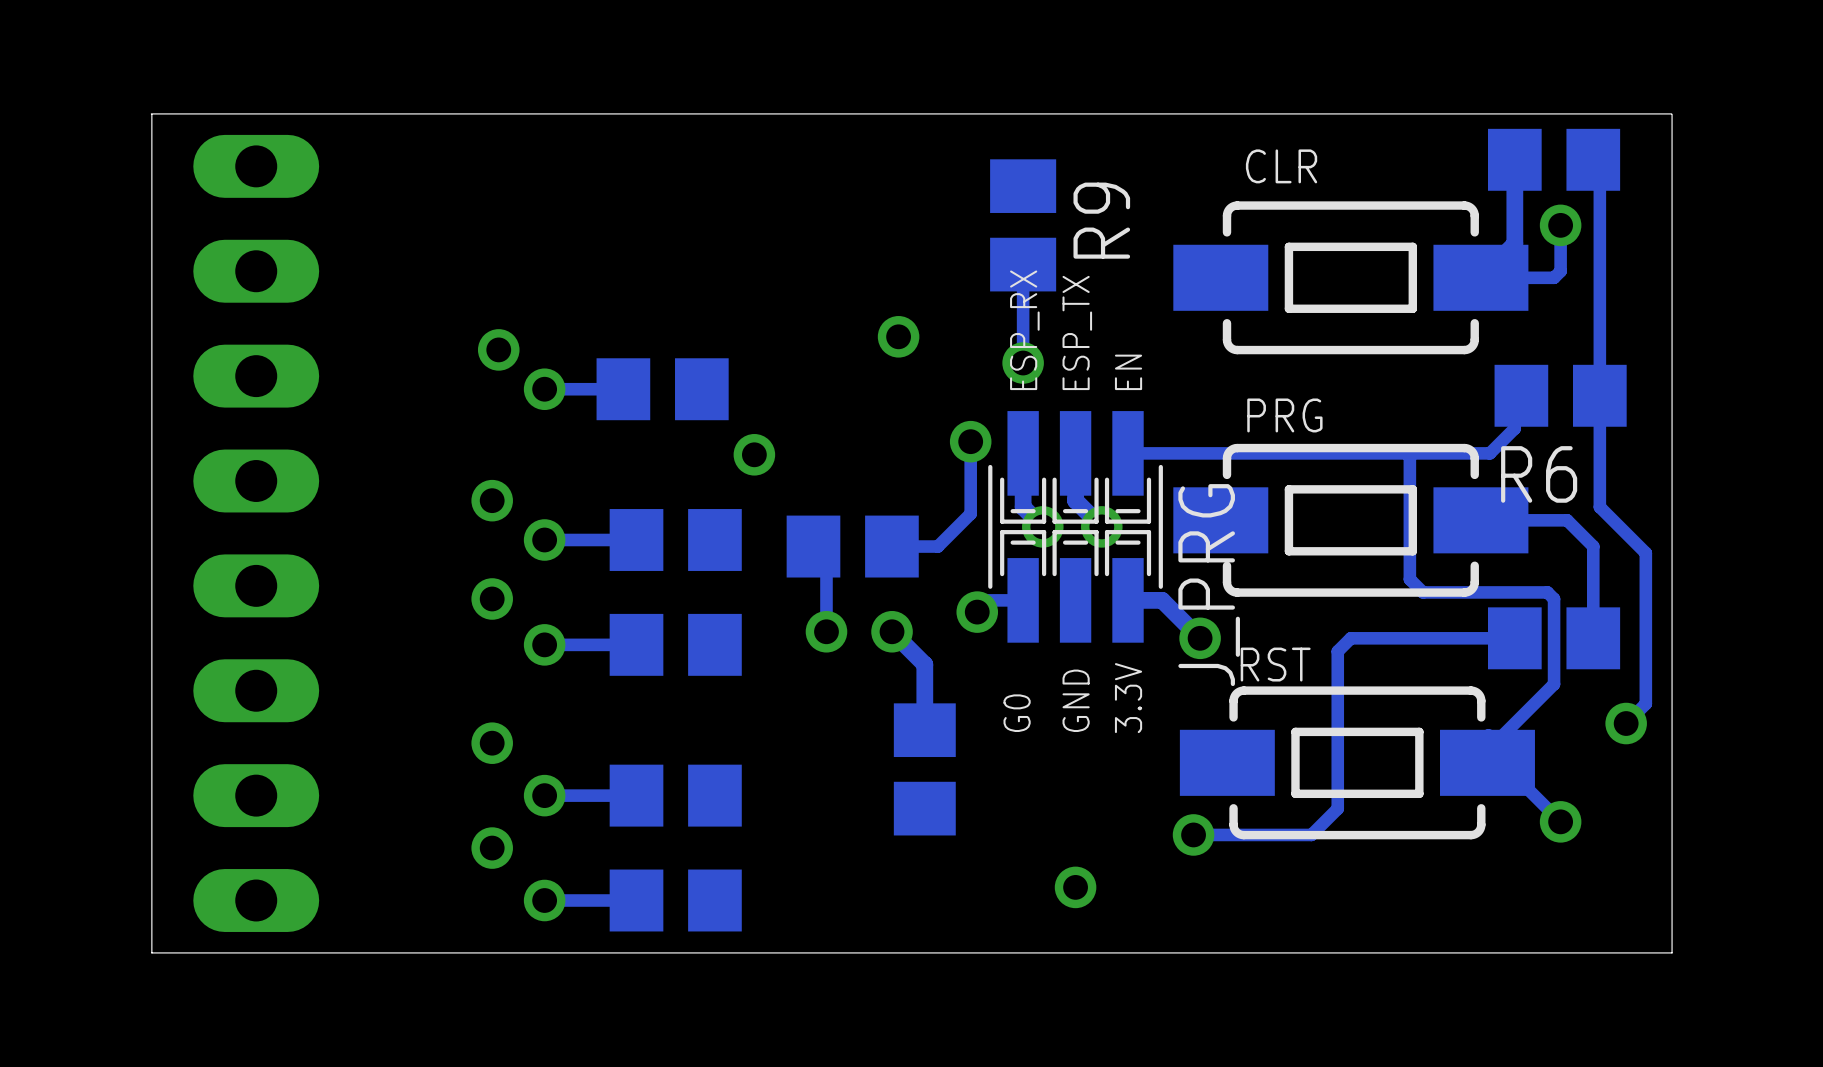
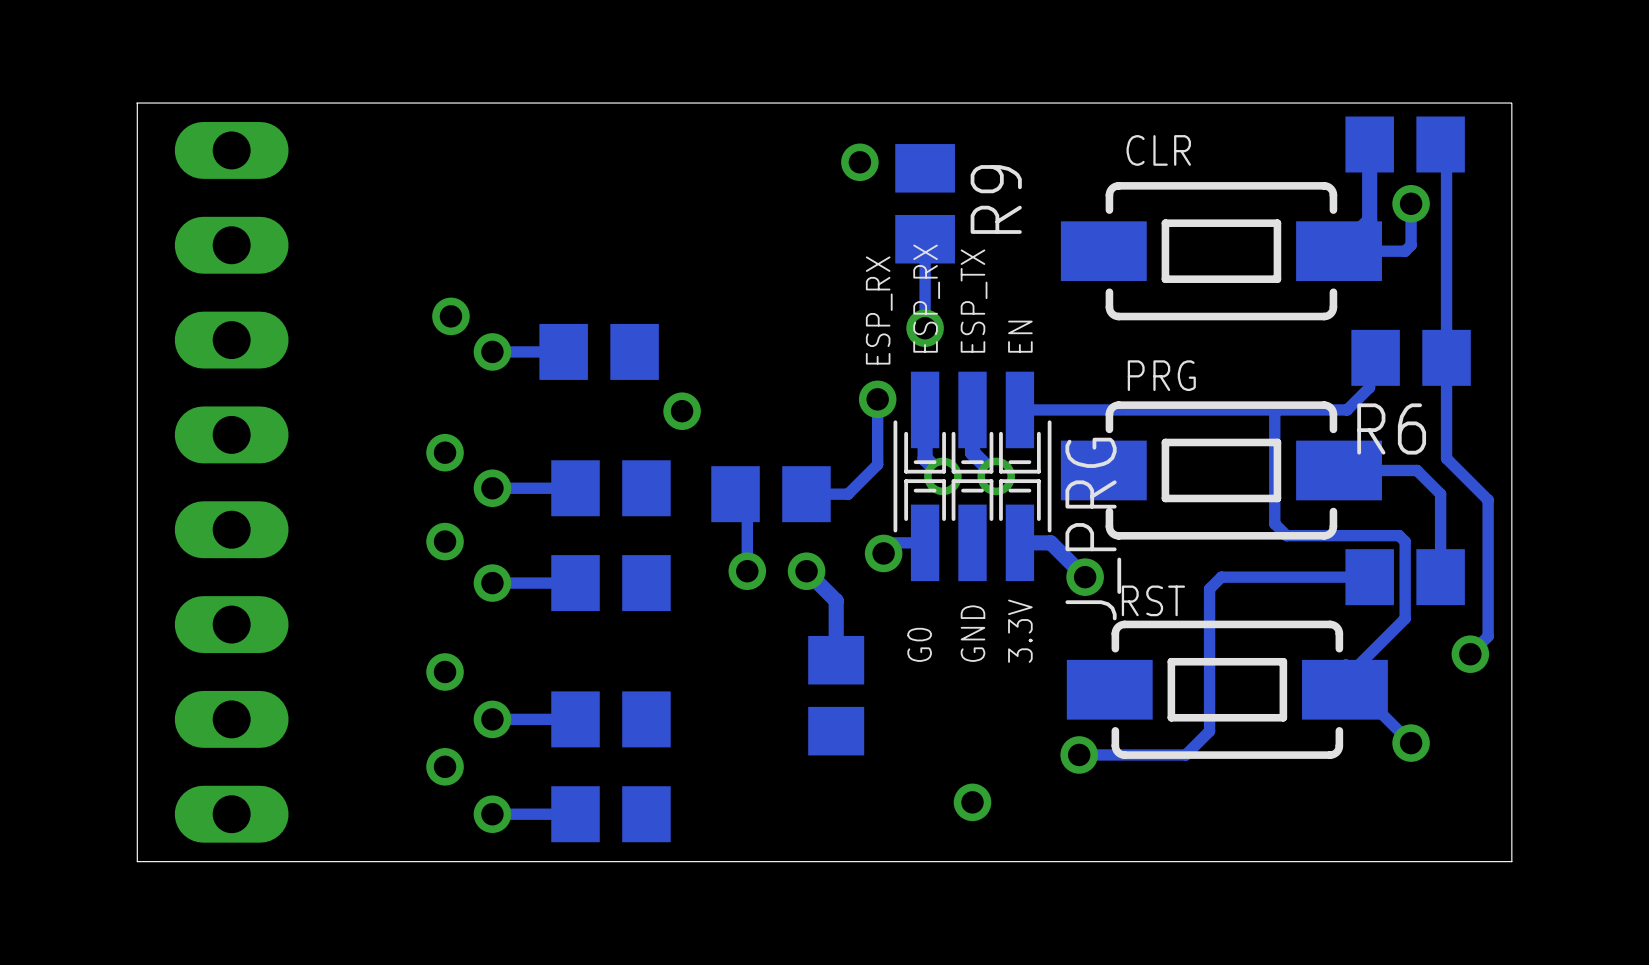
via position: (898, 336) -> (859, 162)
text: none -> ESP_RX (879, 310)

